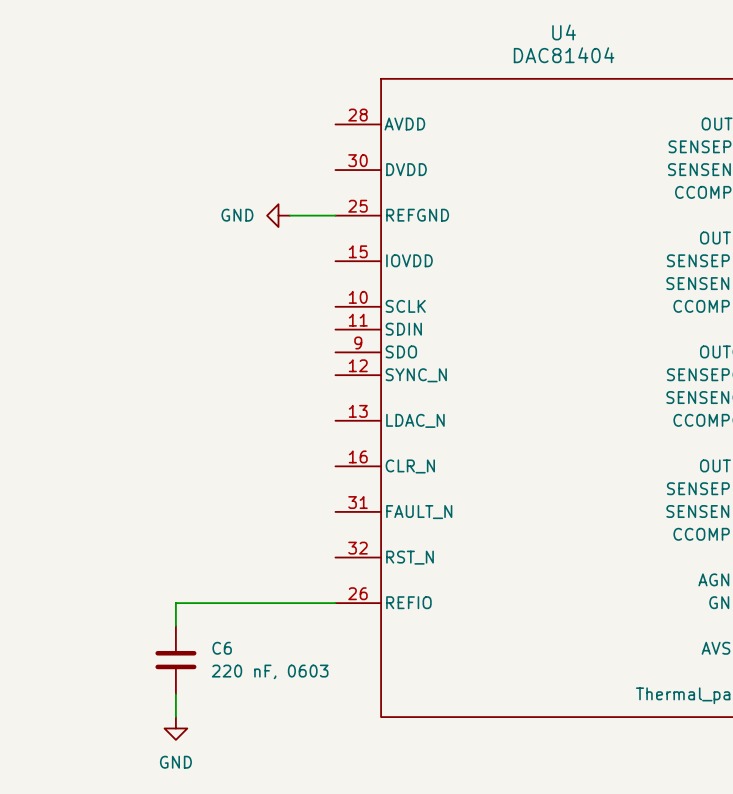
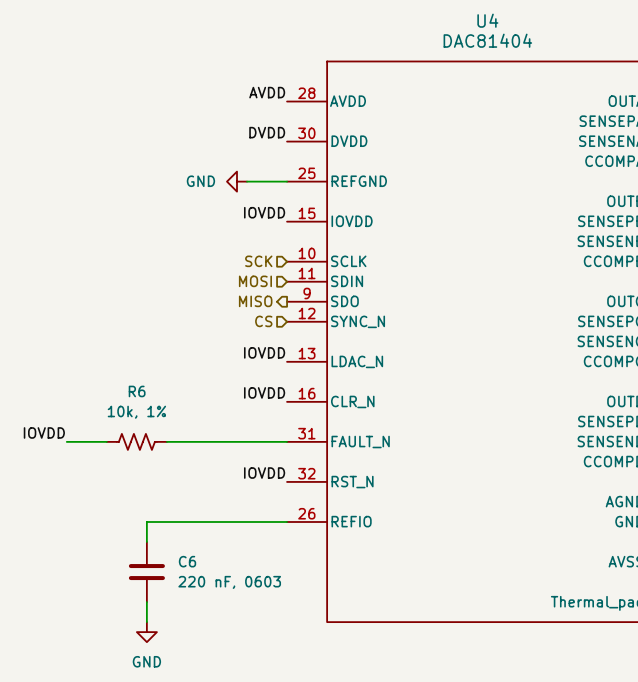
label: none -> AVDD (267, 92)
label: none -> DVDD (267, 132)
label: none -> IOVDD (264, 212)
hierarchical label: none -> SCK (258, 261)
hierarchical label: none -> MOSI (255, 281)
hierarchical label: none -> MISO (255, 301)
hierarchical label: none -> CS (263, 321)
label: none -> IOVDD (264, 352)
label: none -> IOVDD (264, 392)
label: none -> IOVDD (44, 432)
wire: none -> (66, 441) (106, 441)
R6: none -> 10k, 1% (136, 441)
wire: none -> (166, 441) (287, 441)
label: none -> IOVDD (264, 473)

